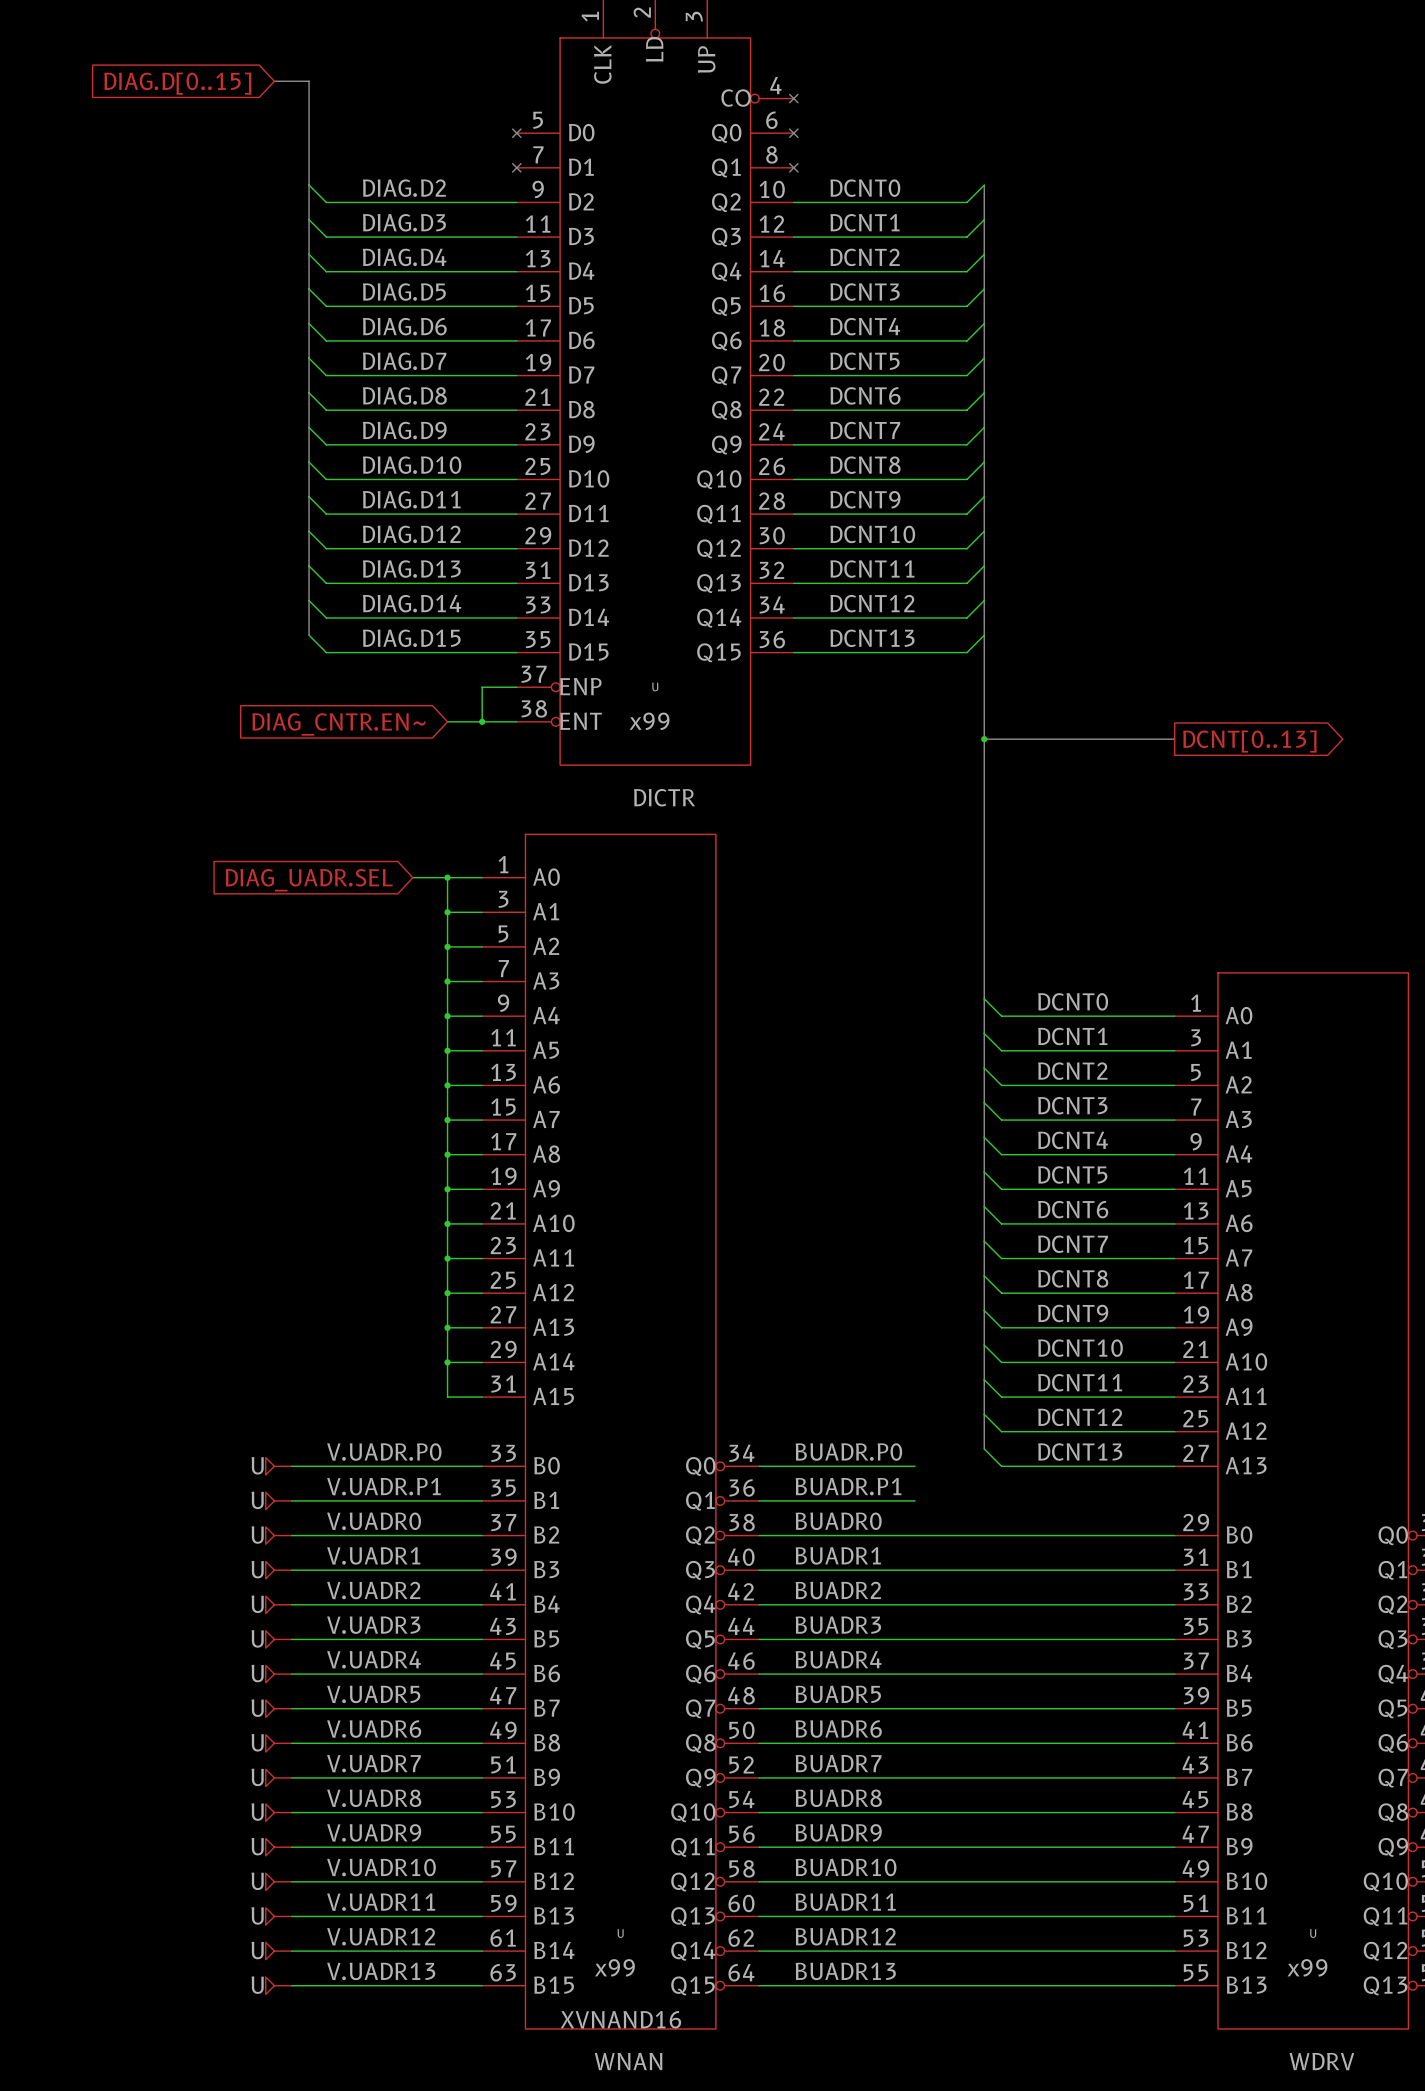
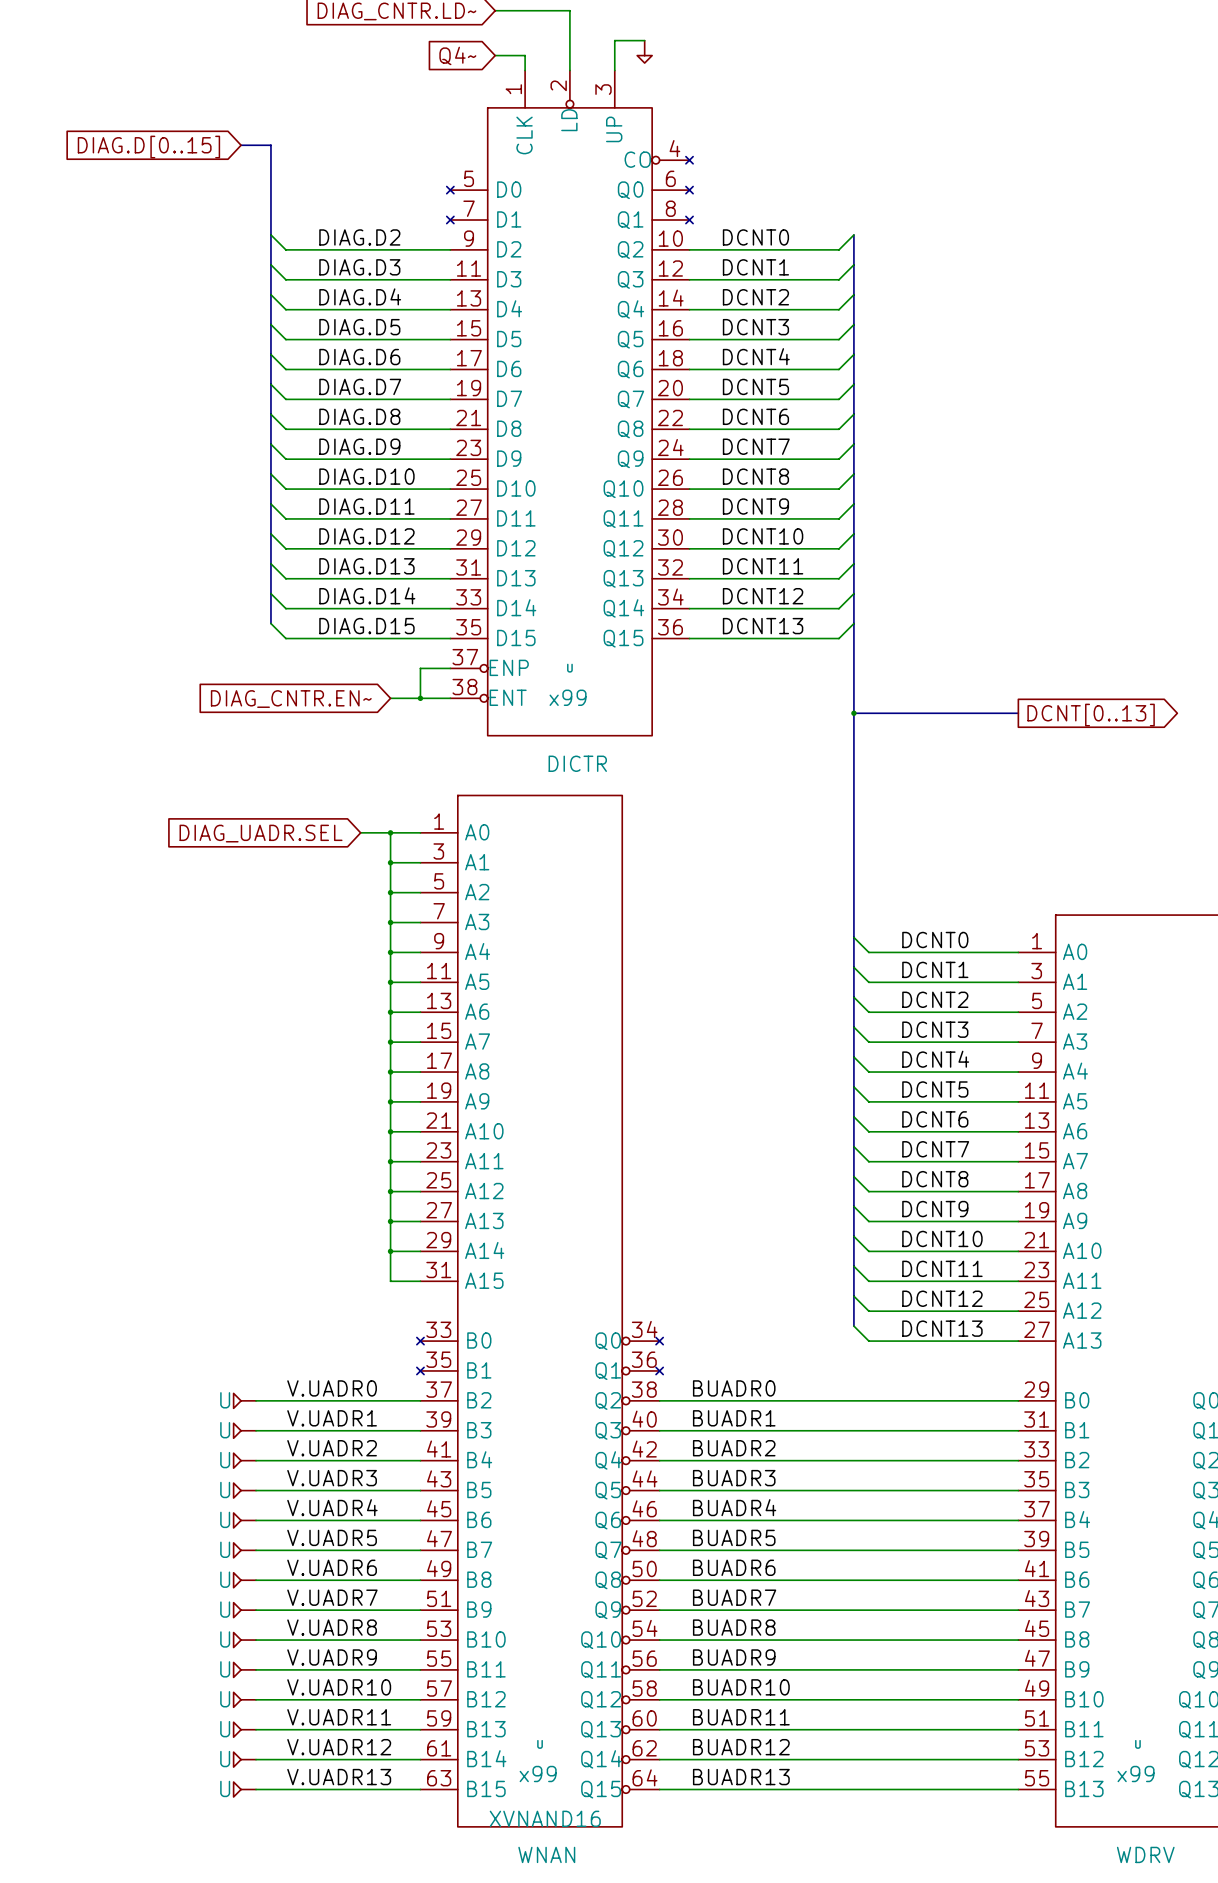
label: V.UADR.P0 (384, 1452) -> none
label: BUADR.P0 (848, 1452) -> none
U: (278, 1466) -> none
wire: (291, 1466) (482, 1466) -> none
no-connect mark: none -> (420, 1341)
wire: (759, 1466) (915, 1466) -> none
no-connect mark: none -> (659, 1341)
label: V.UADR.P1 (383, 1486) -> none
label: BUADR.P1 (848, 1486) -> none
U: (278, 1500) -> none
wire: (291, 1500) (482, 1500) -> none
no-connect mark: none -> (420, 1370)
wire: (759, 1500) (915, 1500) -> none
no-connect mark: none -> (659, 1370)

